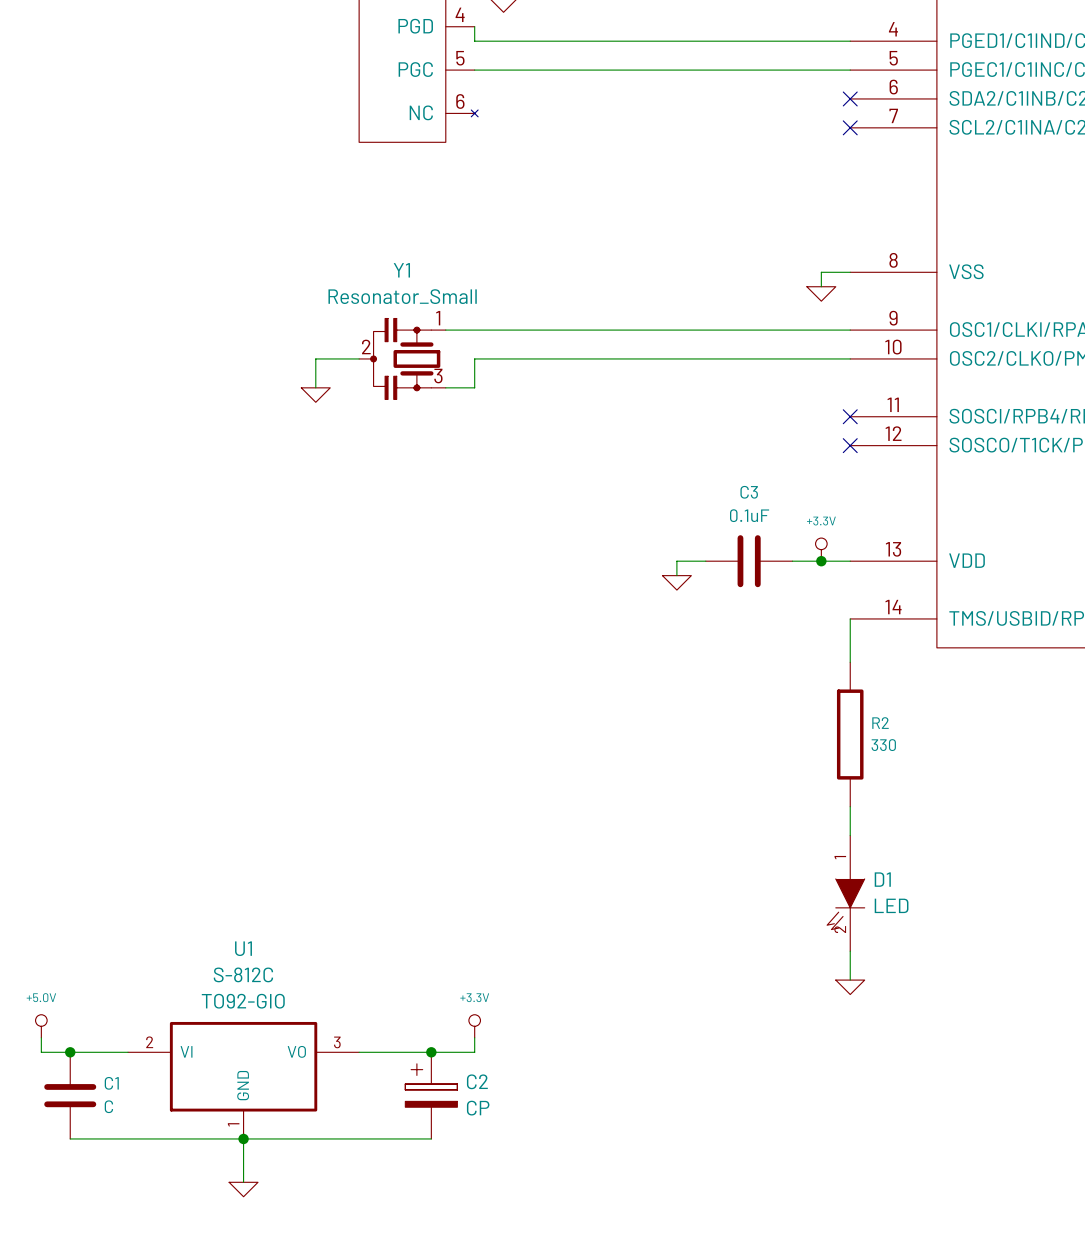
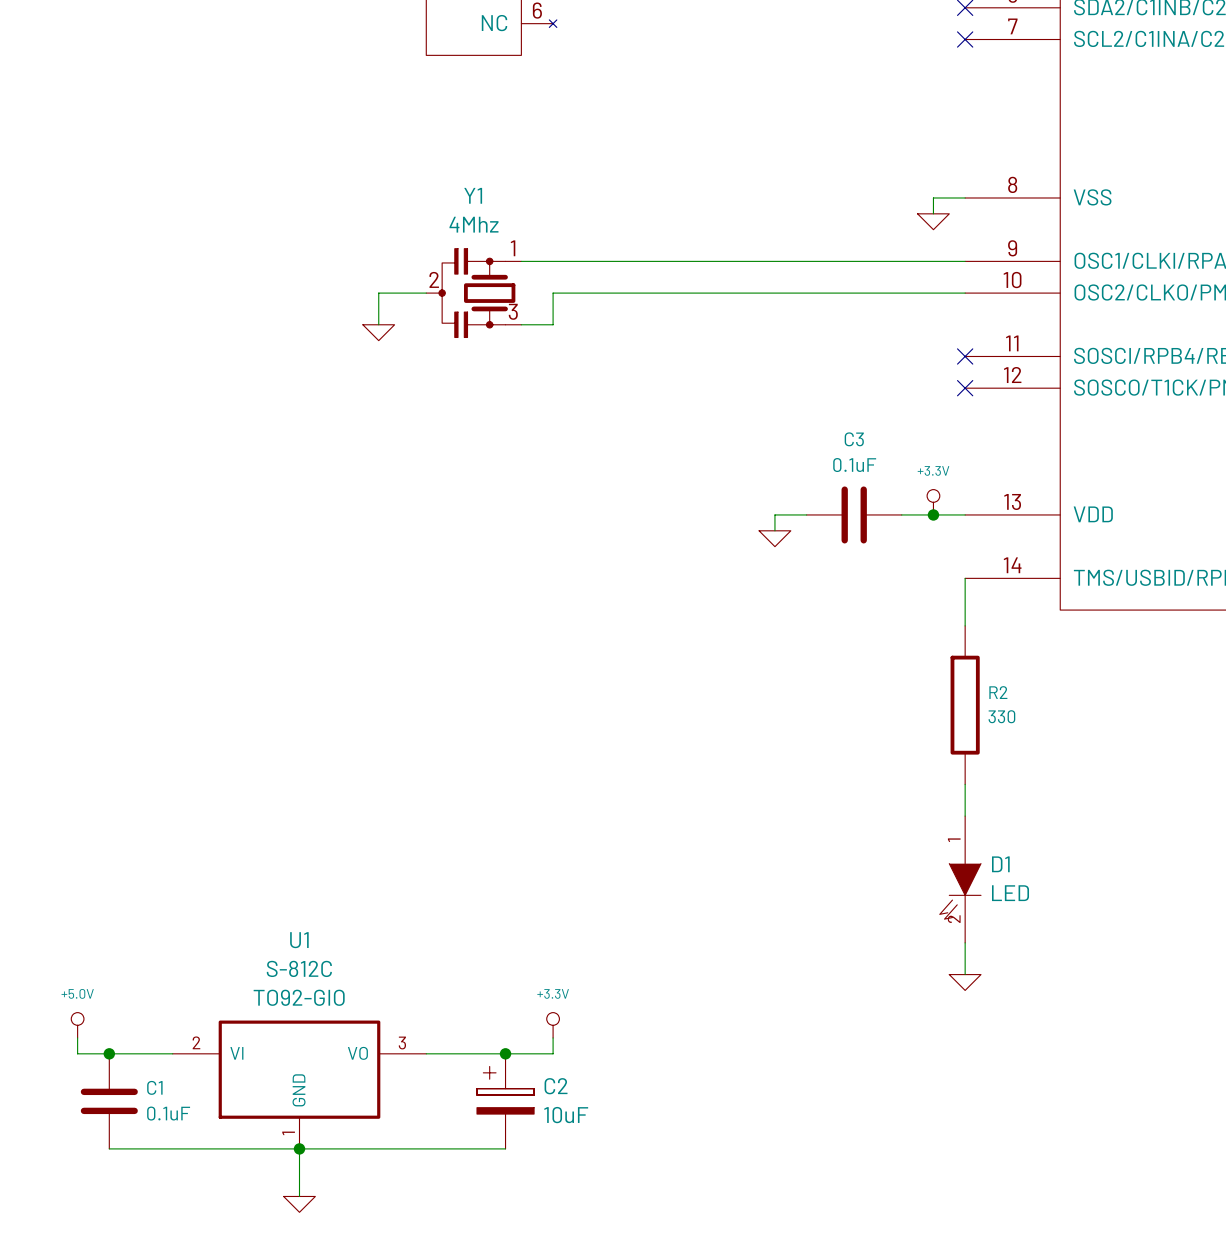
Y1 value: Resonator_Small (402, 296) -> 4Mhz (473, 224)
C1 value: C (108, 1106) -> 0.1uF (168, 1113)
C2 value: CP (478, 1108) -> 10uF (566, 1115)

